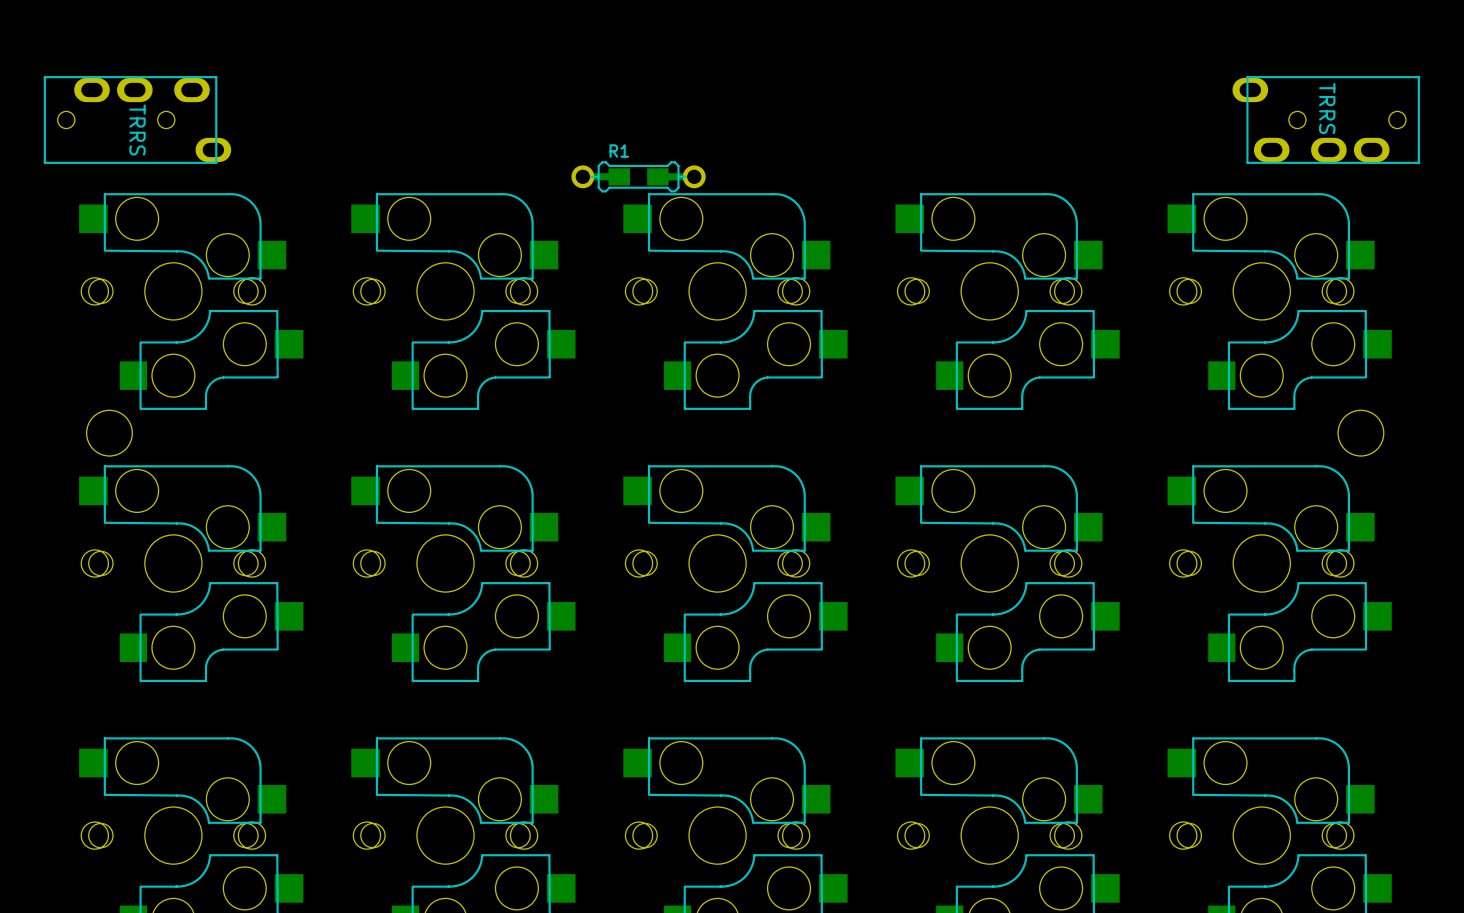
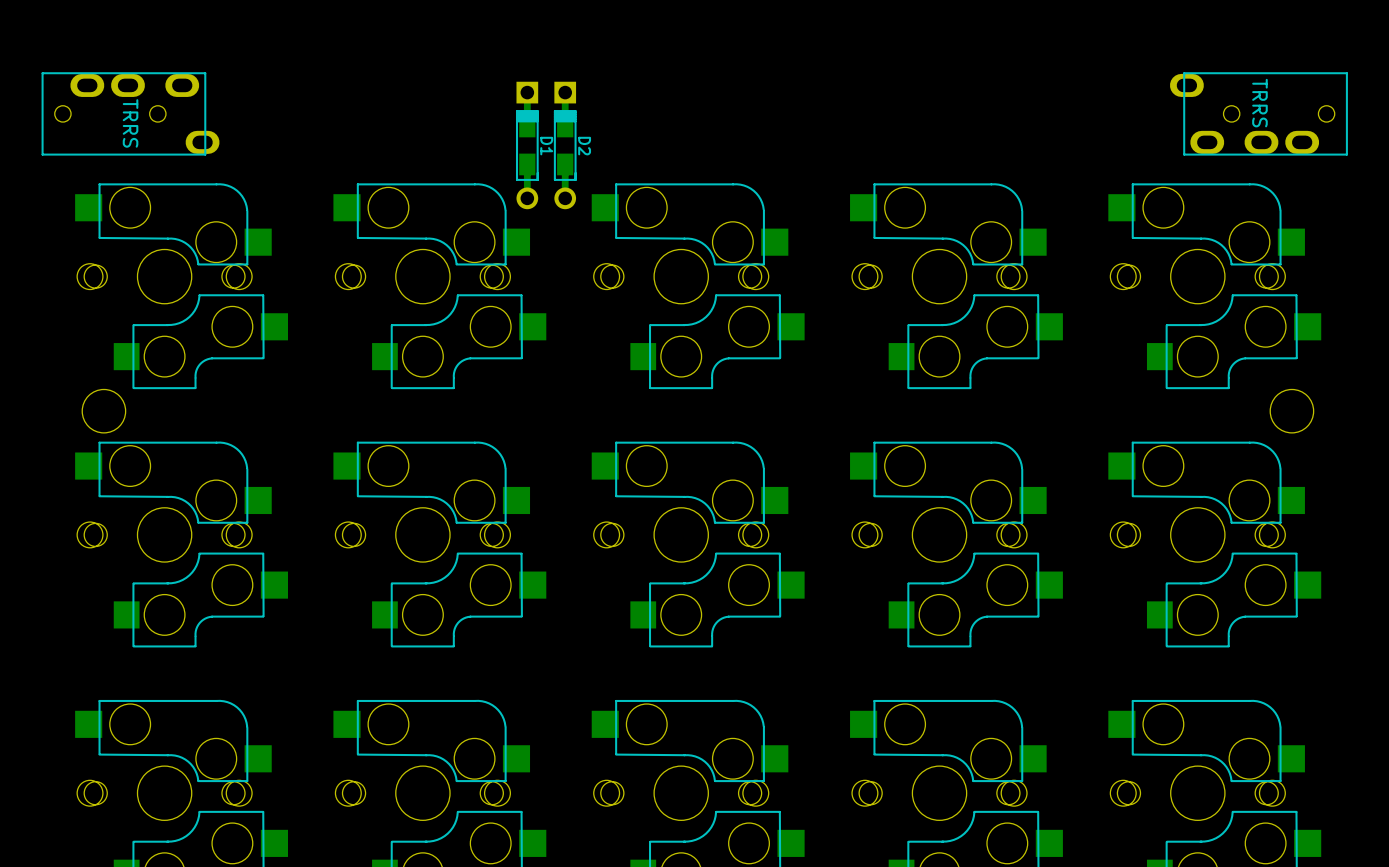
D1: none -> (527, 145)
D2: none -> (565, 145)
R1: (638, 176) -> none

